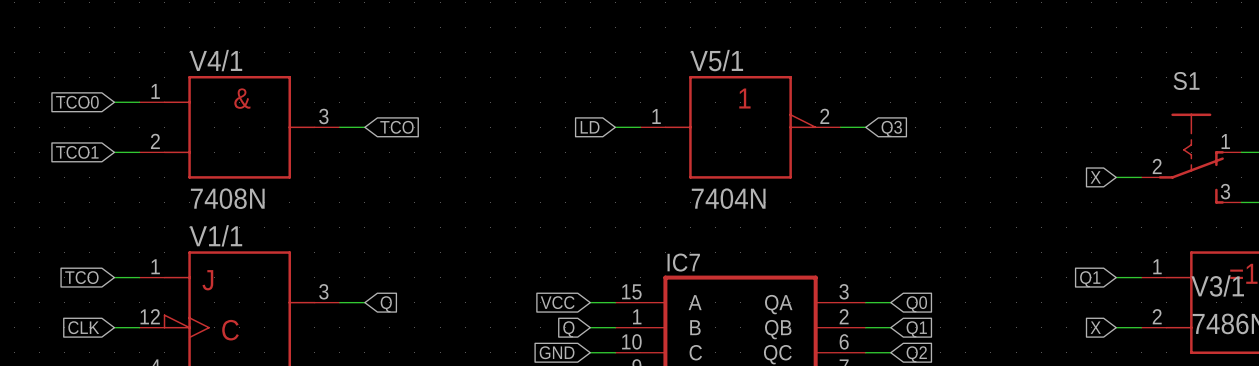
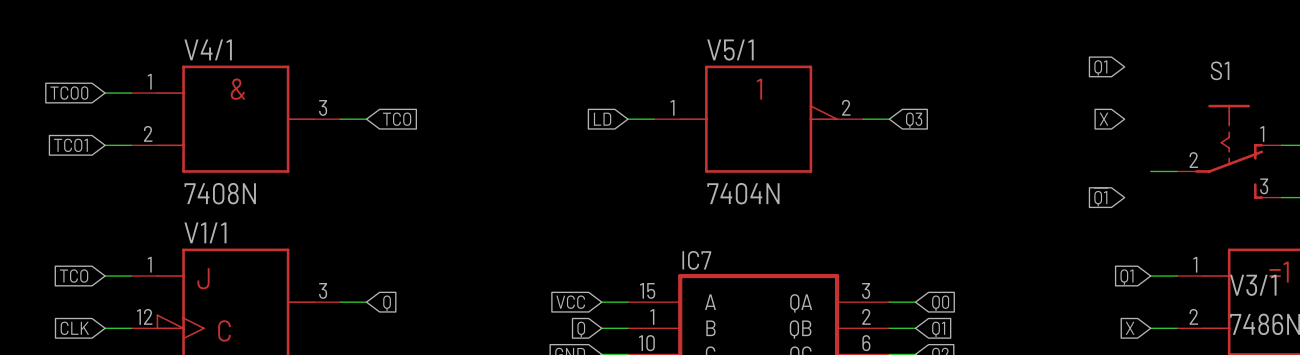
global label: none -> Q1 (1100, 67)
global label position: X (1095, 177) -> X (1103, 119)
global label: none -> ~{Q1} (1101, 197)

